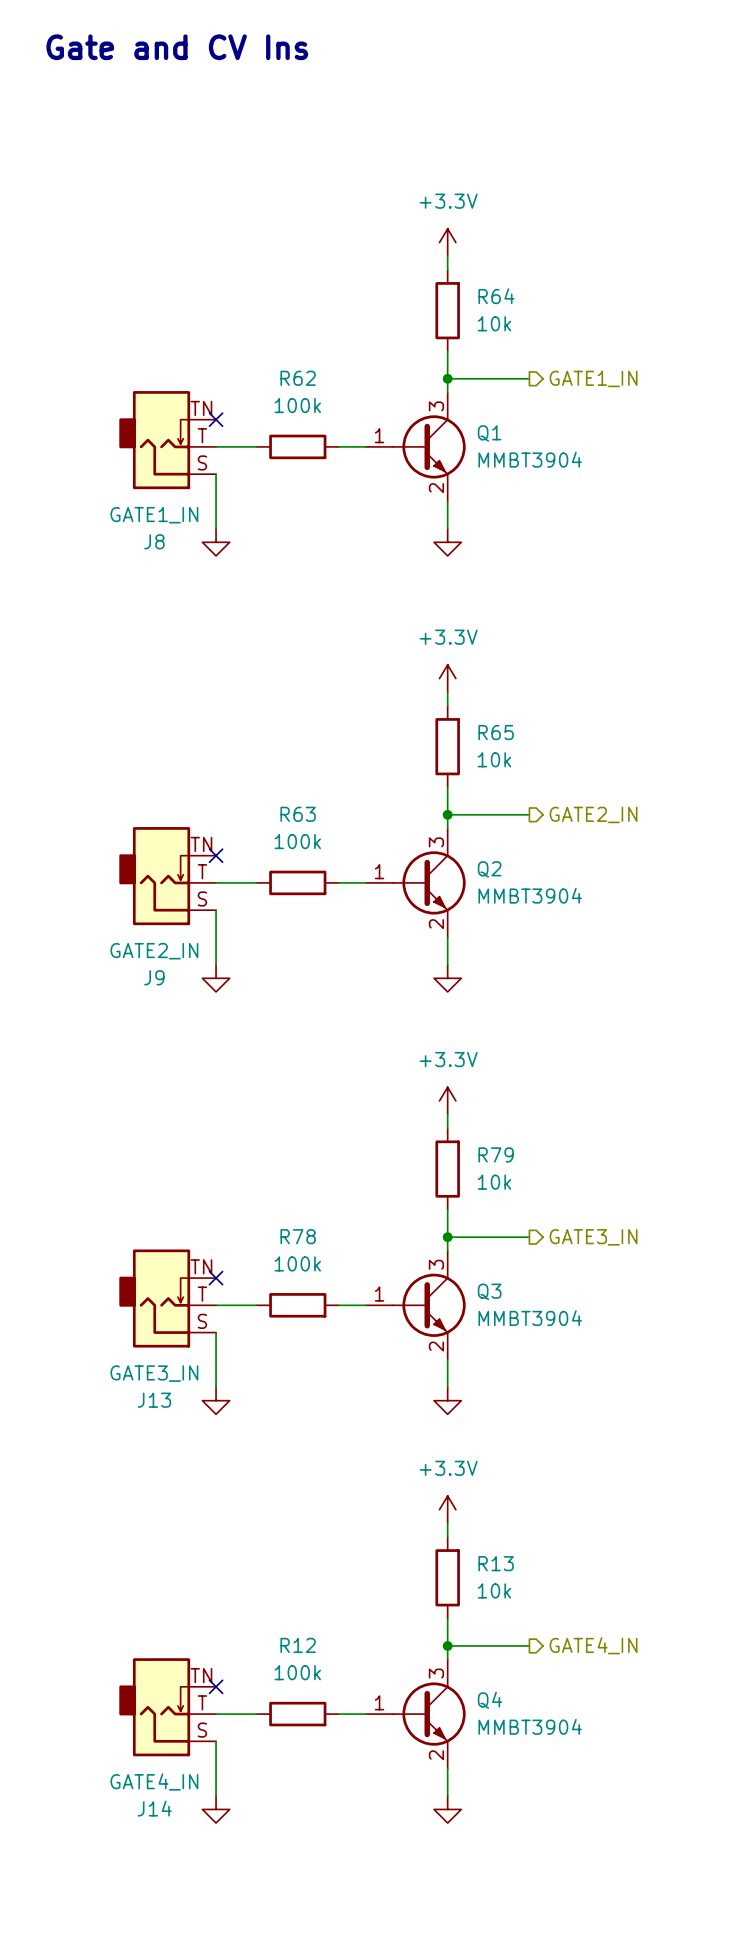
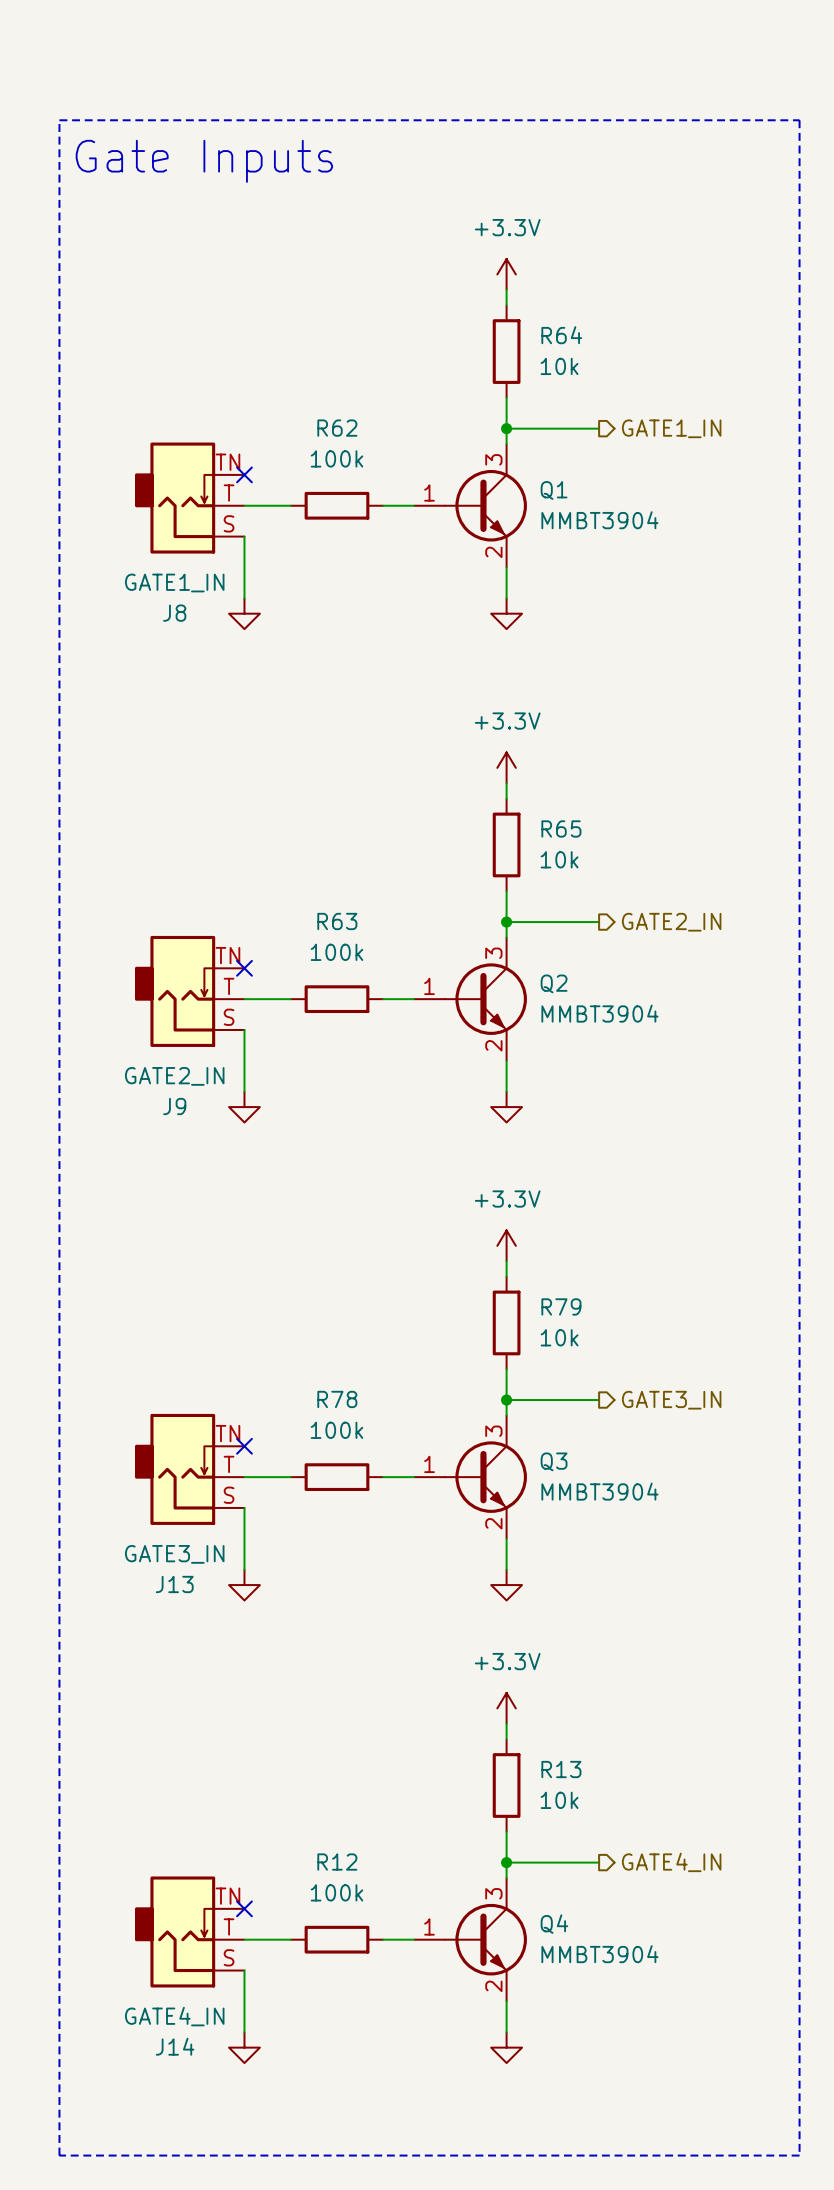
text: Gate and CV Ins (177, 47) -> none
line: none -> (59, 120) (799, 120) (799, 2155) (59, 2155) (59, 120)
text: none -> Gate Inputs (204, 161)

